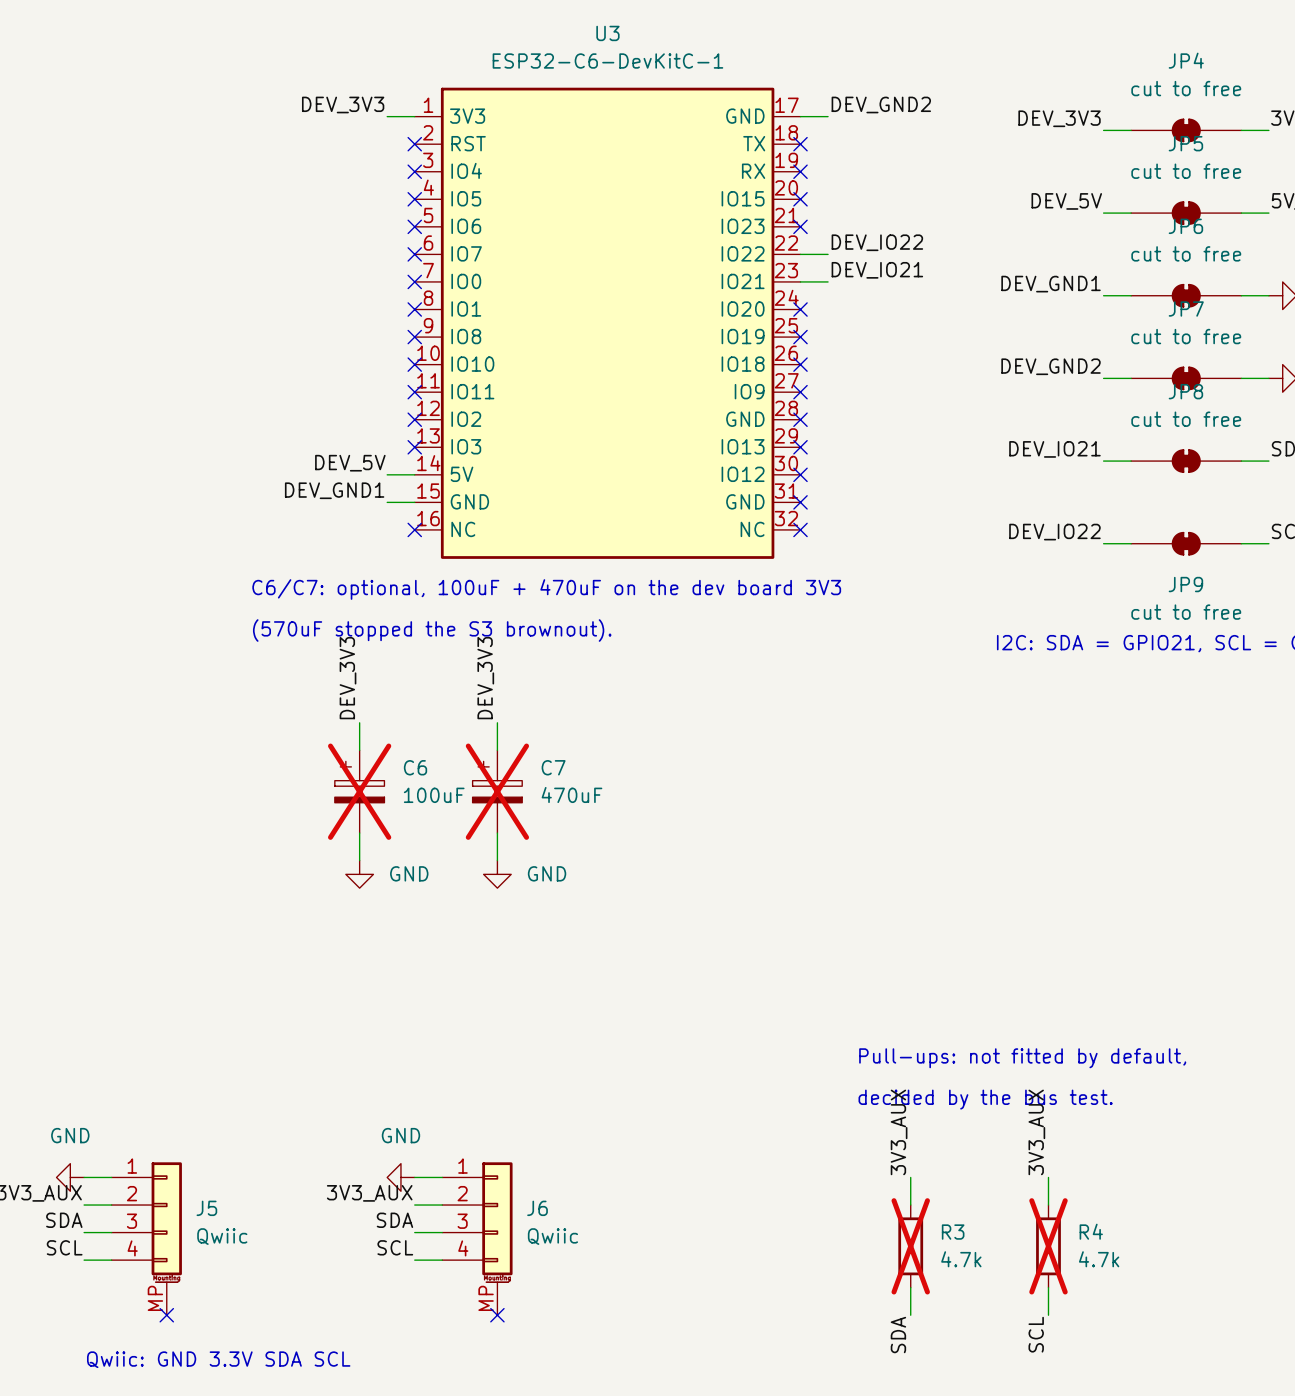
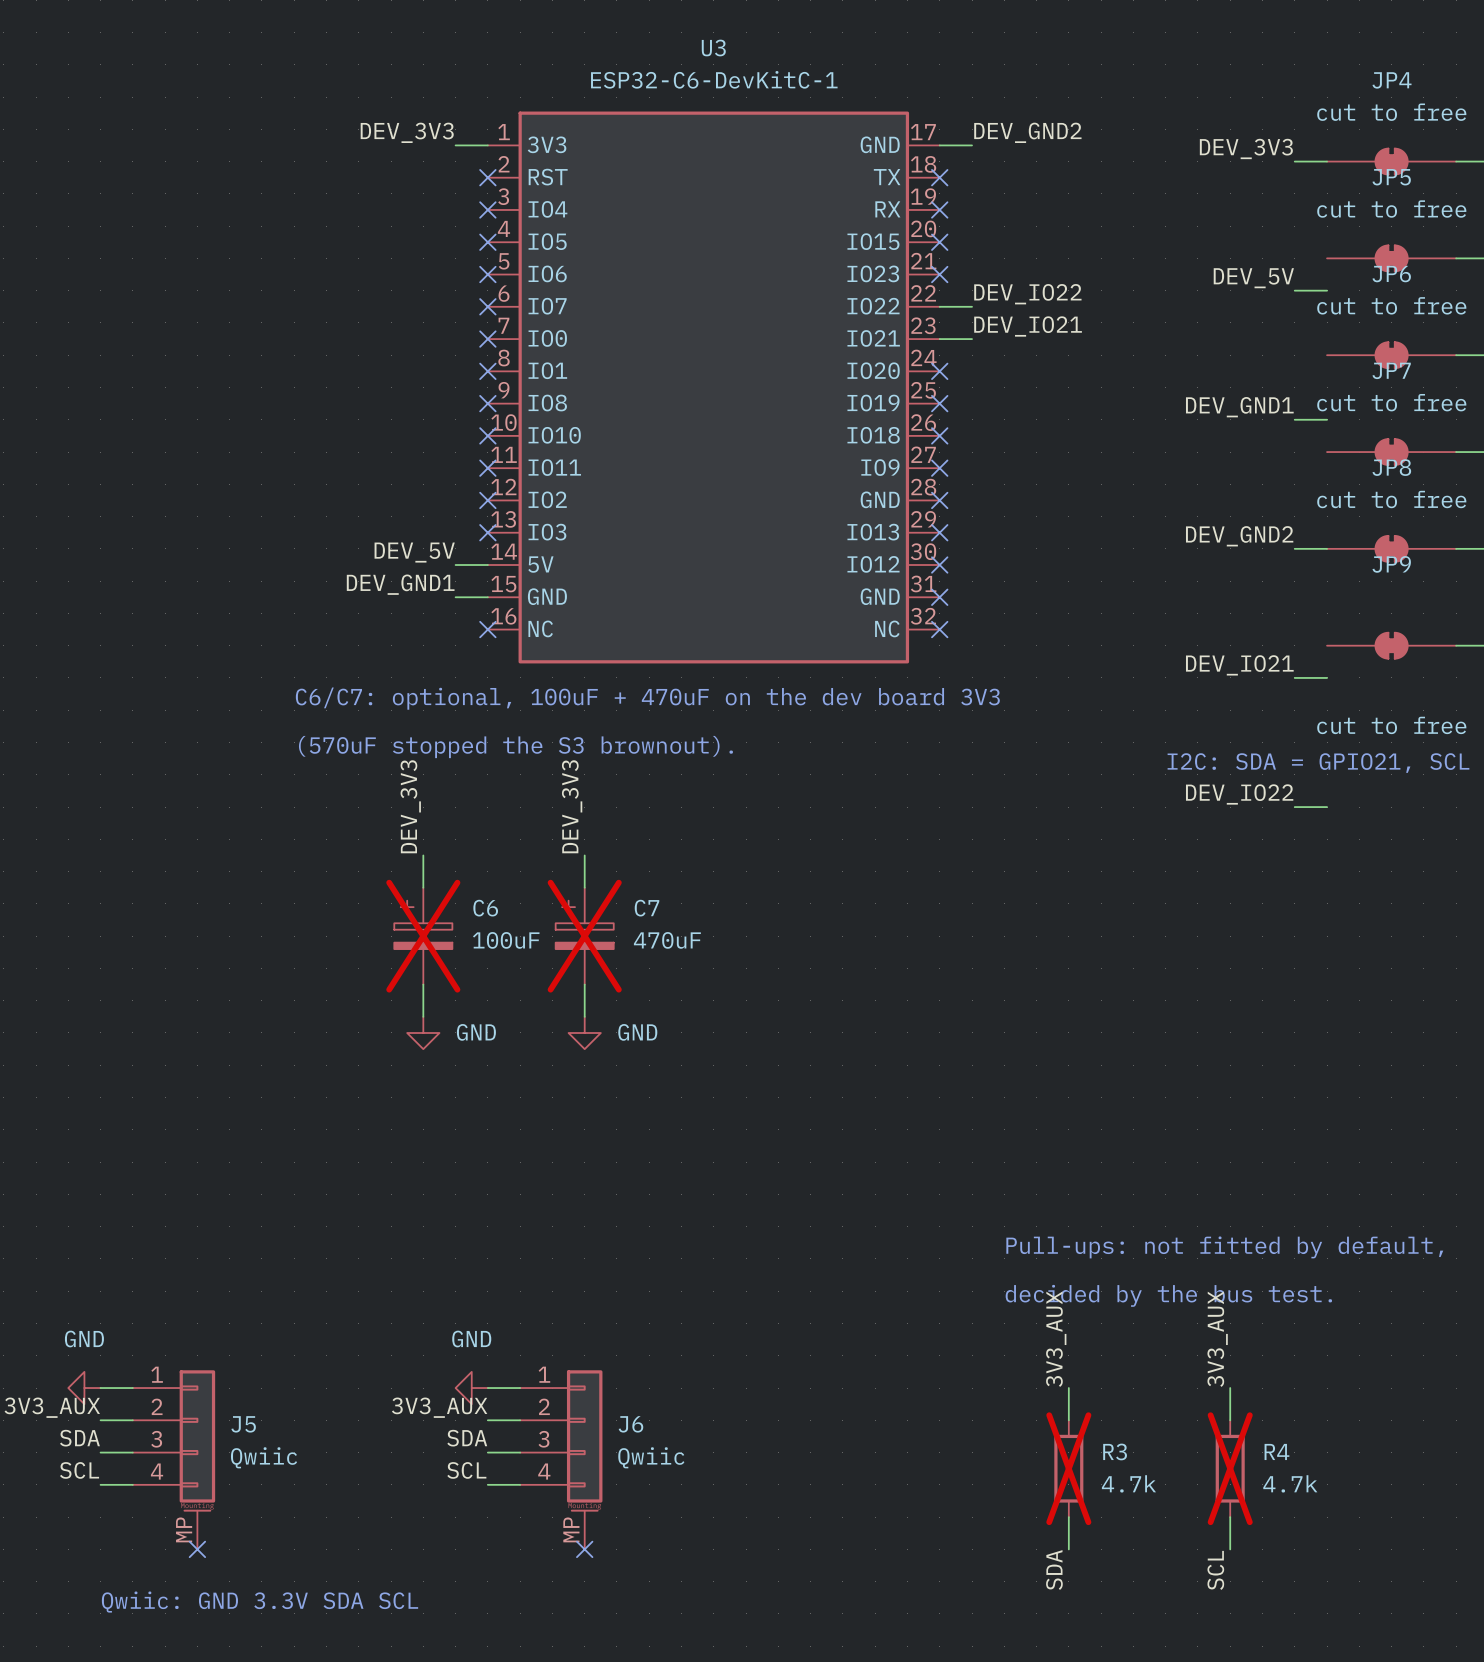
label position: DEV_5V (1066, 201) -> DEV_5V (1253, 278)
wire: (1103, 213) (1131, 213) -> (1294, 290) (1327, 290)
label position: DEV_GND1 (1051, 284) -> DEV_GND1 (1239, 407)
wire: (1103, 295) (1131, 295) -> none
label: DEV_GND2 (1051, 366) -> none
wire: (1103, 378) (1131, 378) -> (1294, 419) (1327, 419)
label: DEV_IO21 (1054, 449) -> DEV_GND2 (1239, 536)
label position: DEV_IO22 (1054, 532) -> DEV_IO22 (1239, 794)
wire: (1103, 543) (1131, 543) -> (1294, 677) (1327, 677)
label: none -> DEV_IO21 (1239, 665)
JP9 name position: JP9 (1185, 584) -> JP9 (1391, 564)
wire: none -> (1294, 807) (1327, 807)

